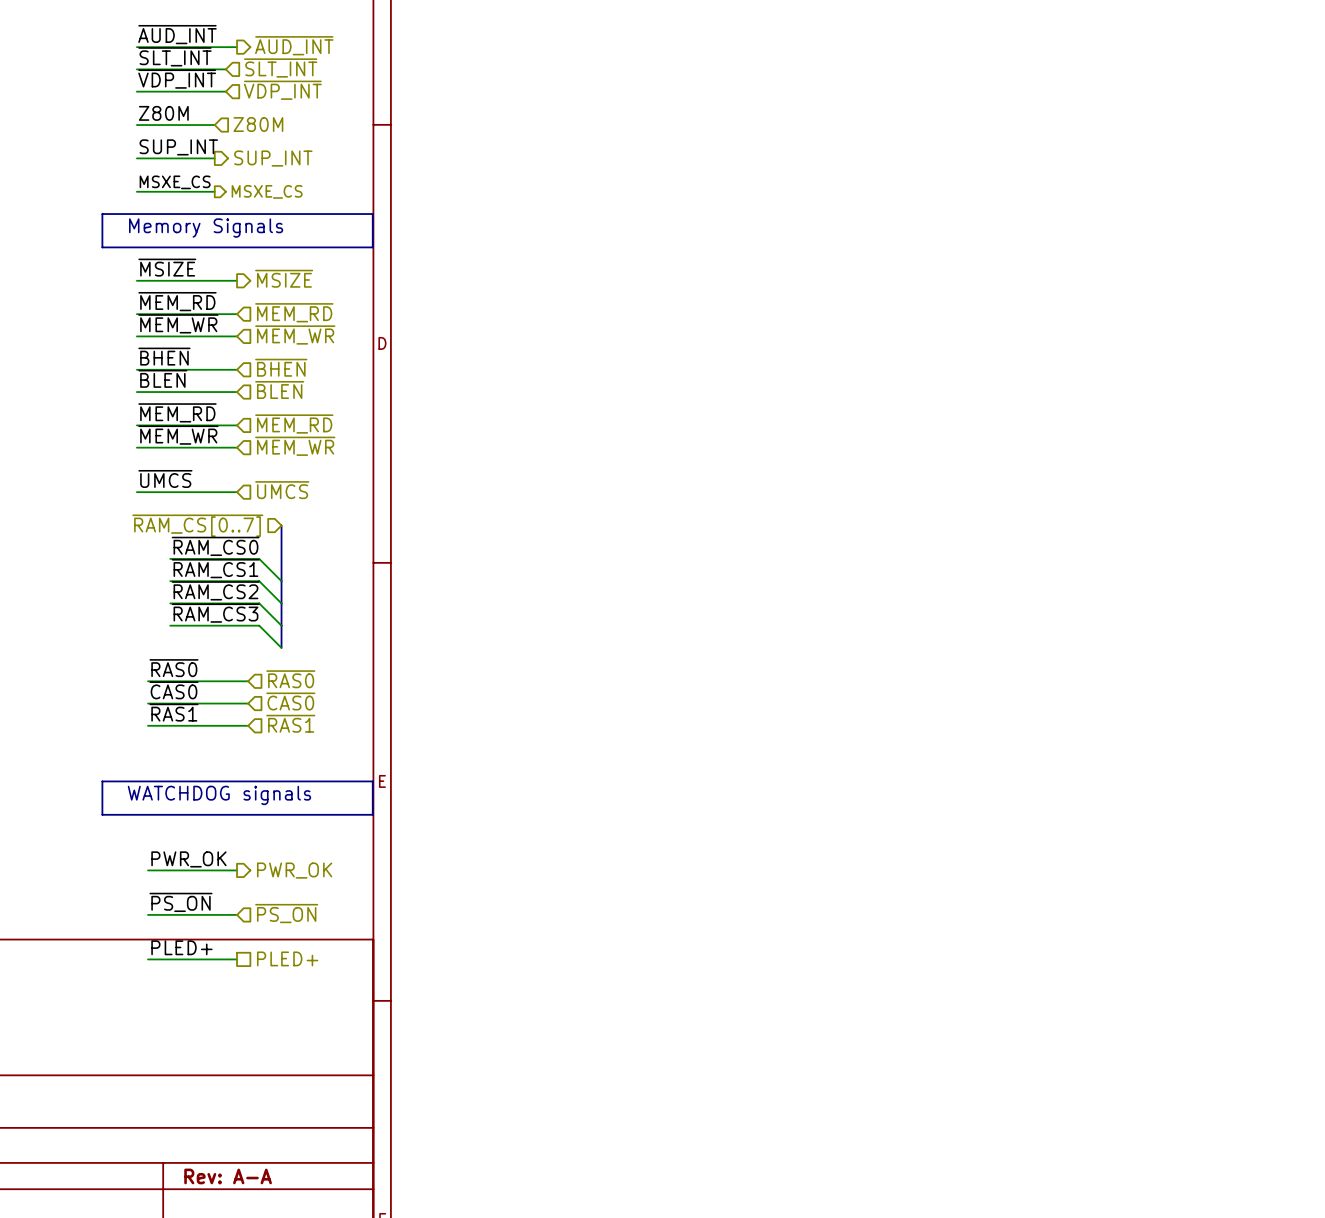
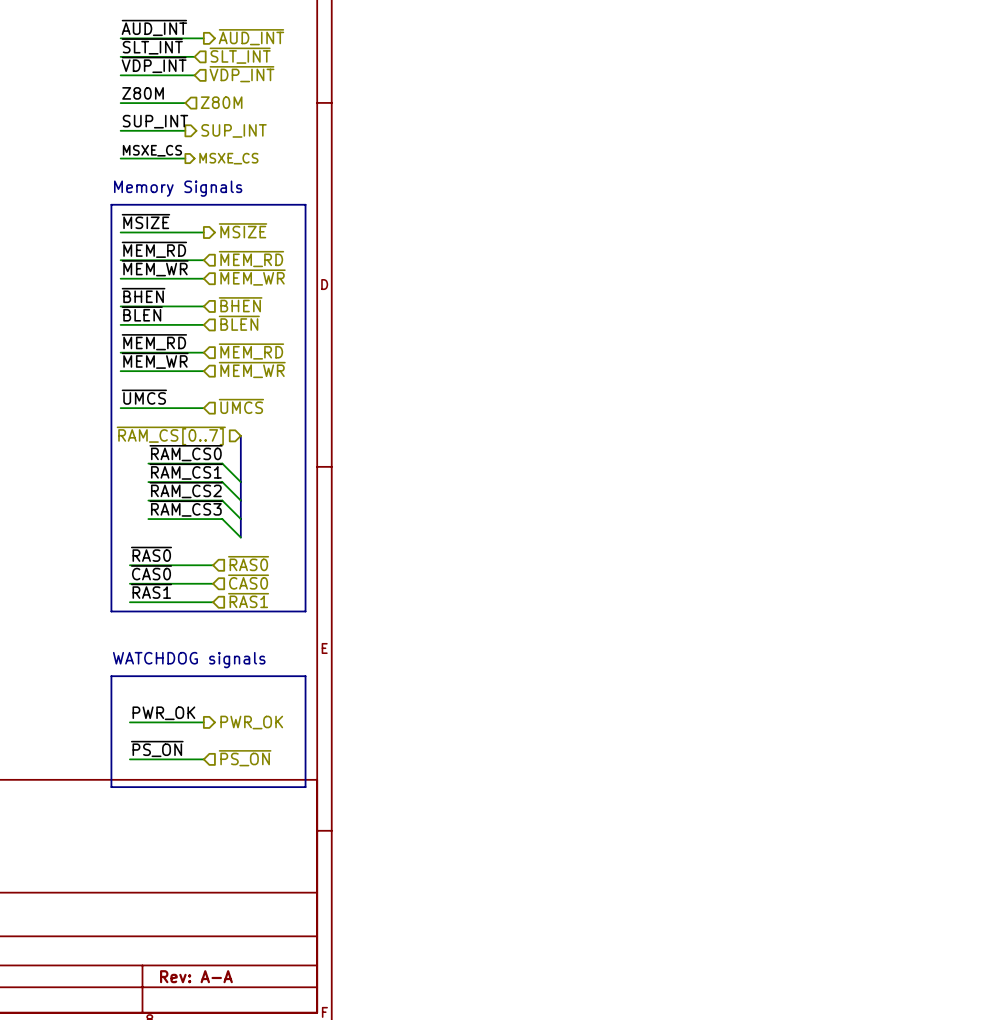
line: (125, 247) (102, 247) (102, 214) (372, 214) (372, 247) (359, 247) -> (111, 204) (111, 611) (305, 611) (305, 204)
line: (125, 814) (102, 814) (102, 781) (372, 781) (372, 814) (359, 814) -> (111, 676) (111, 787) (305, 787) (305, 676)
label: PLED+ (181, 947) -> none
hierarchical label: PLED+ (287, 958) -> none
wire: (148, 959) (237, 959) -> none

